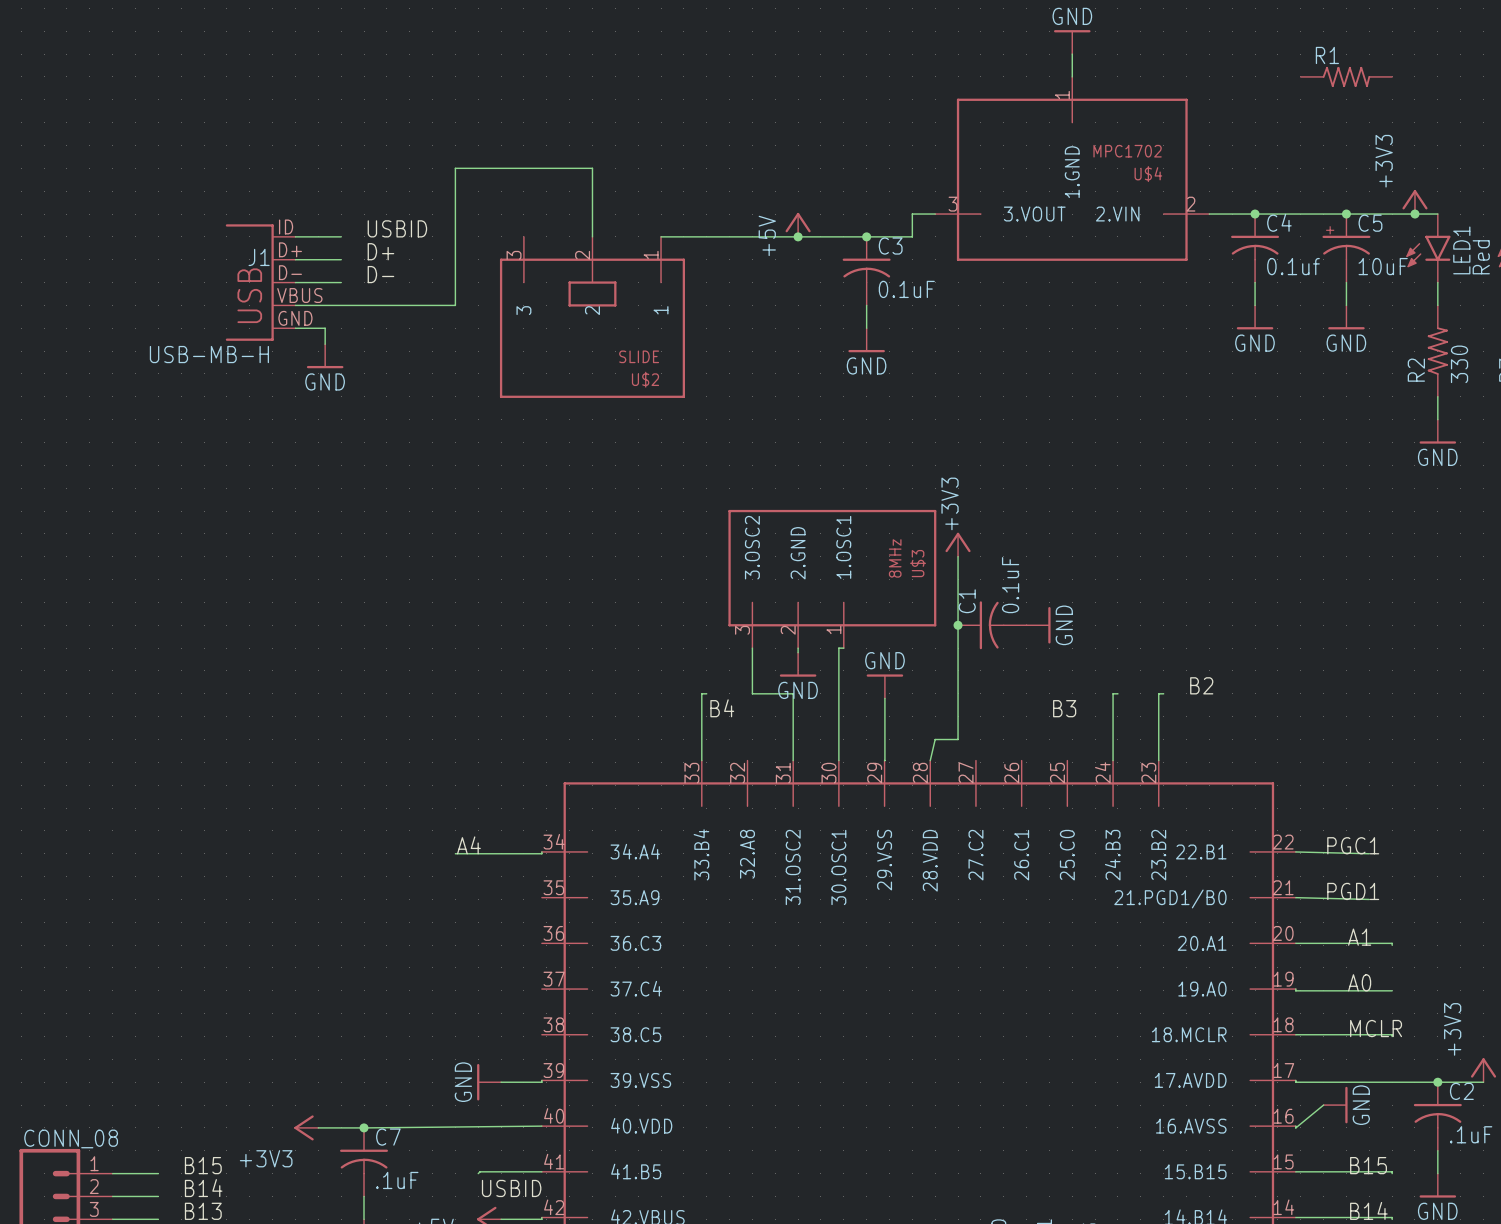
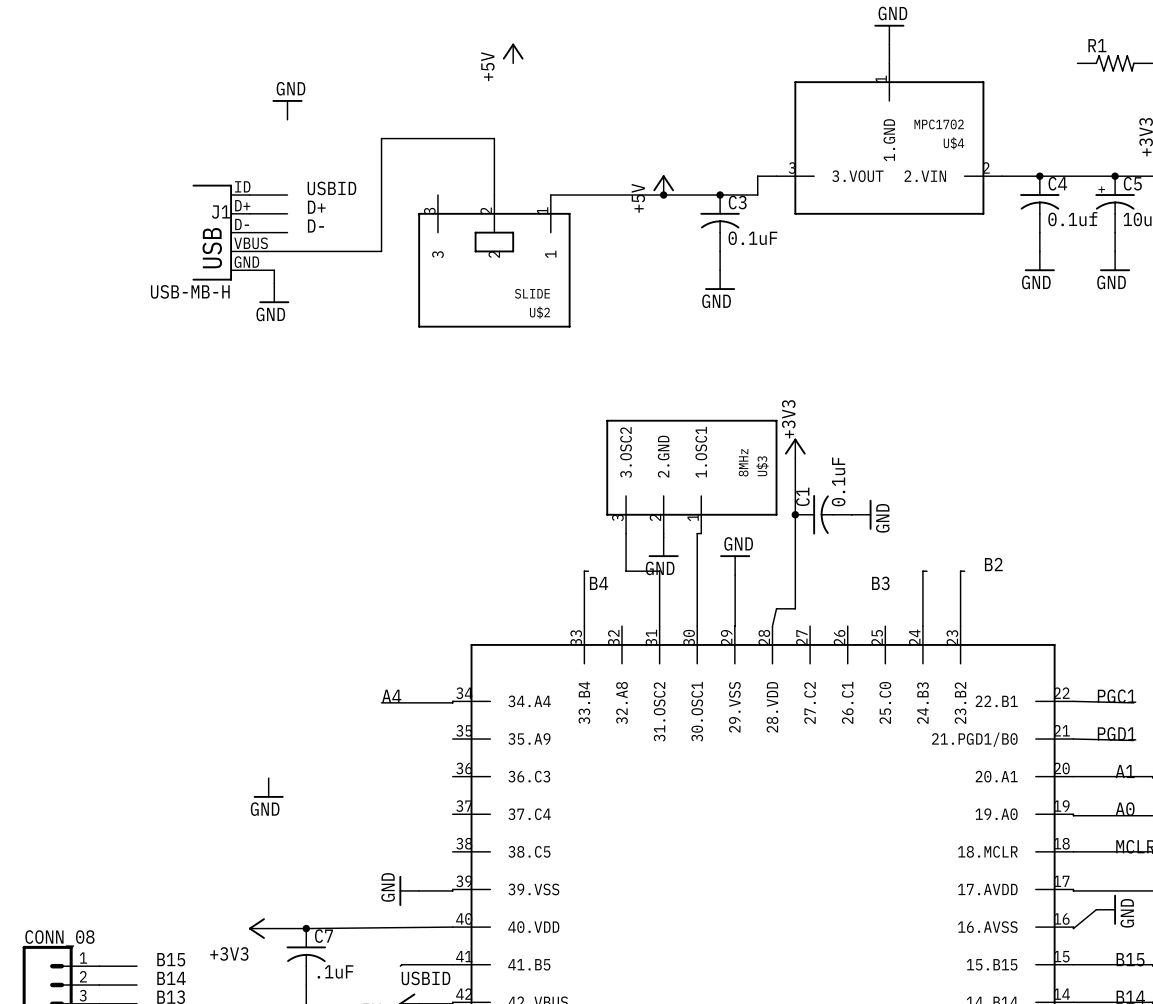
power symbol: none -> +5V (513, 53)
power symbol: none -> GND (287, 109)
power symbol: none -> GND (268, 787)

